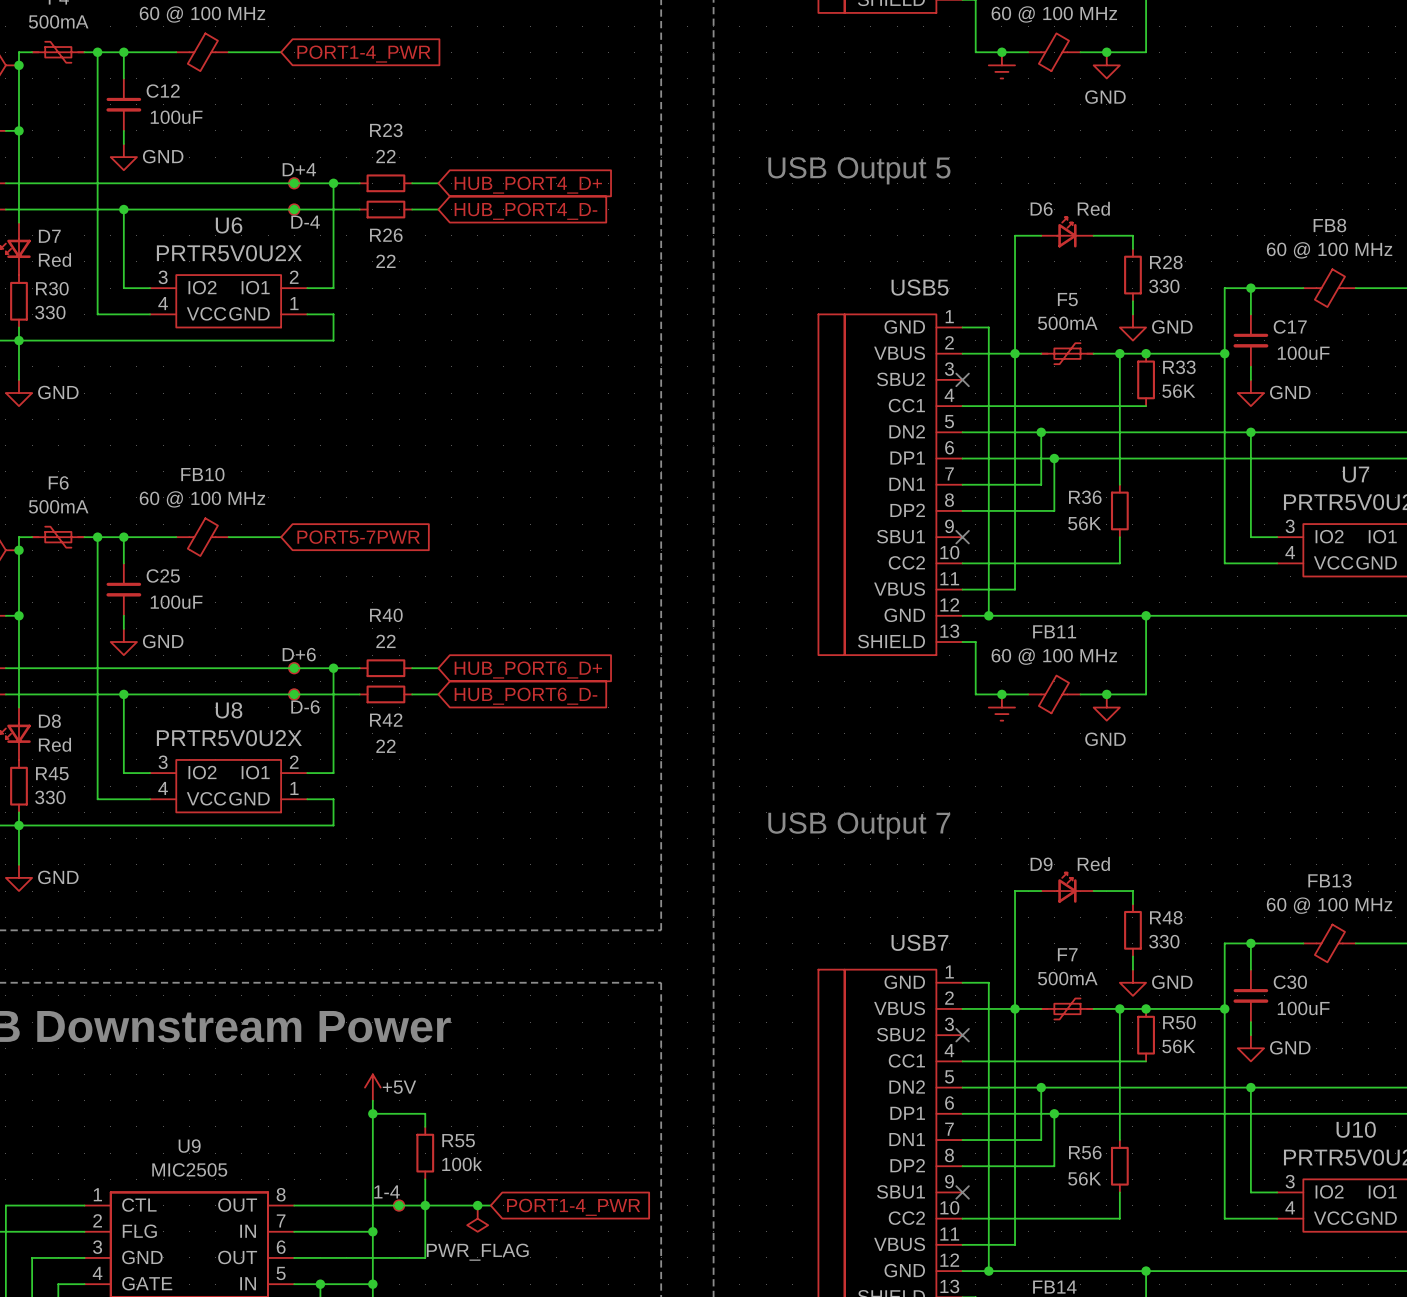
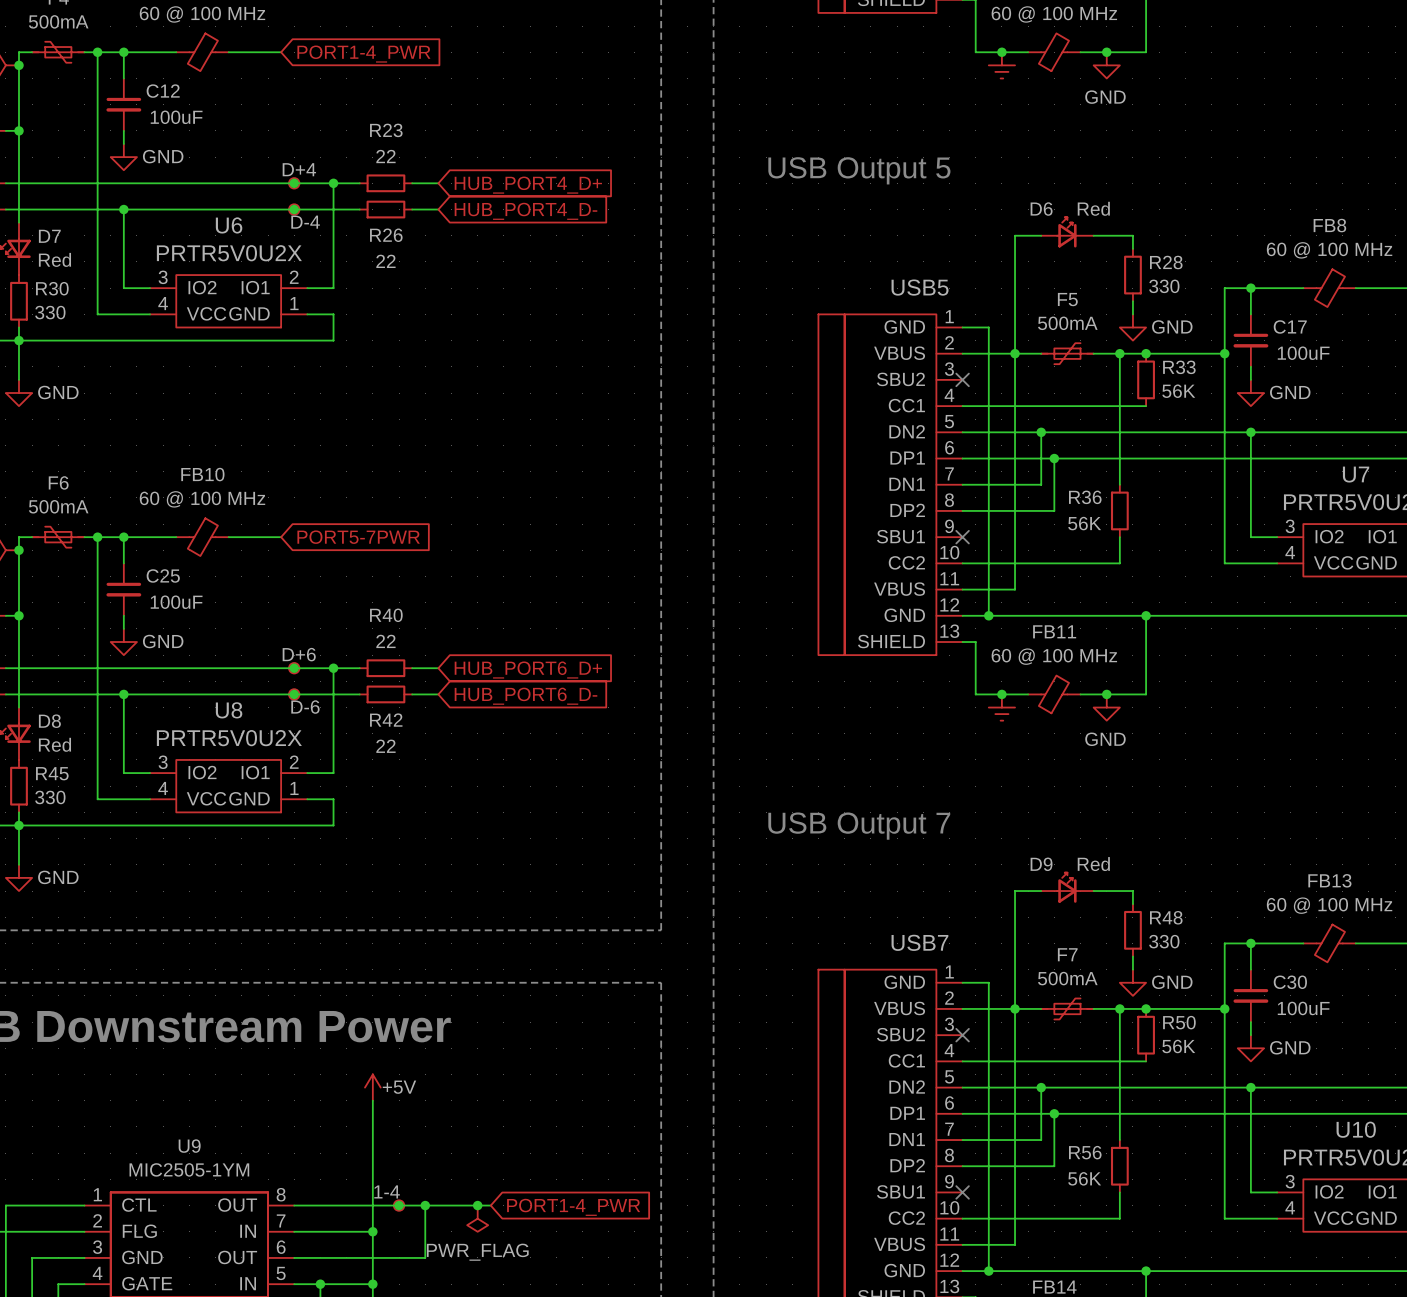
wire: (372, 1113) (425, 1113) (425, 1126) -> none
junction: (372, 1113) -> none
R55: 100k (425, 1153) -> none
U9 value: MIC2505 (189, 1169) -> MIC2505-1YM (189, 1169)
wire: (425, 1179) (425, 1205) -> none

